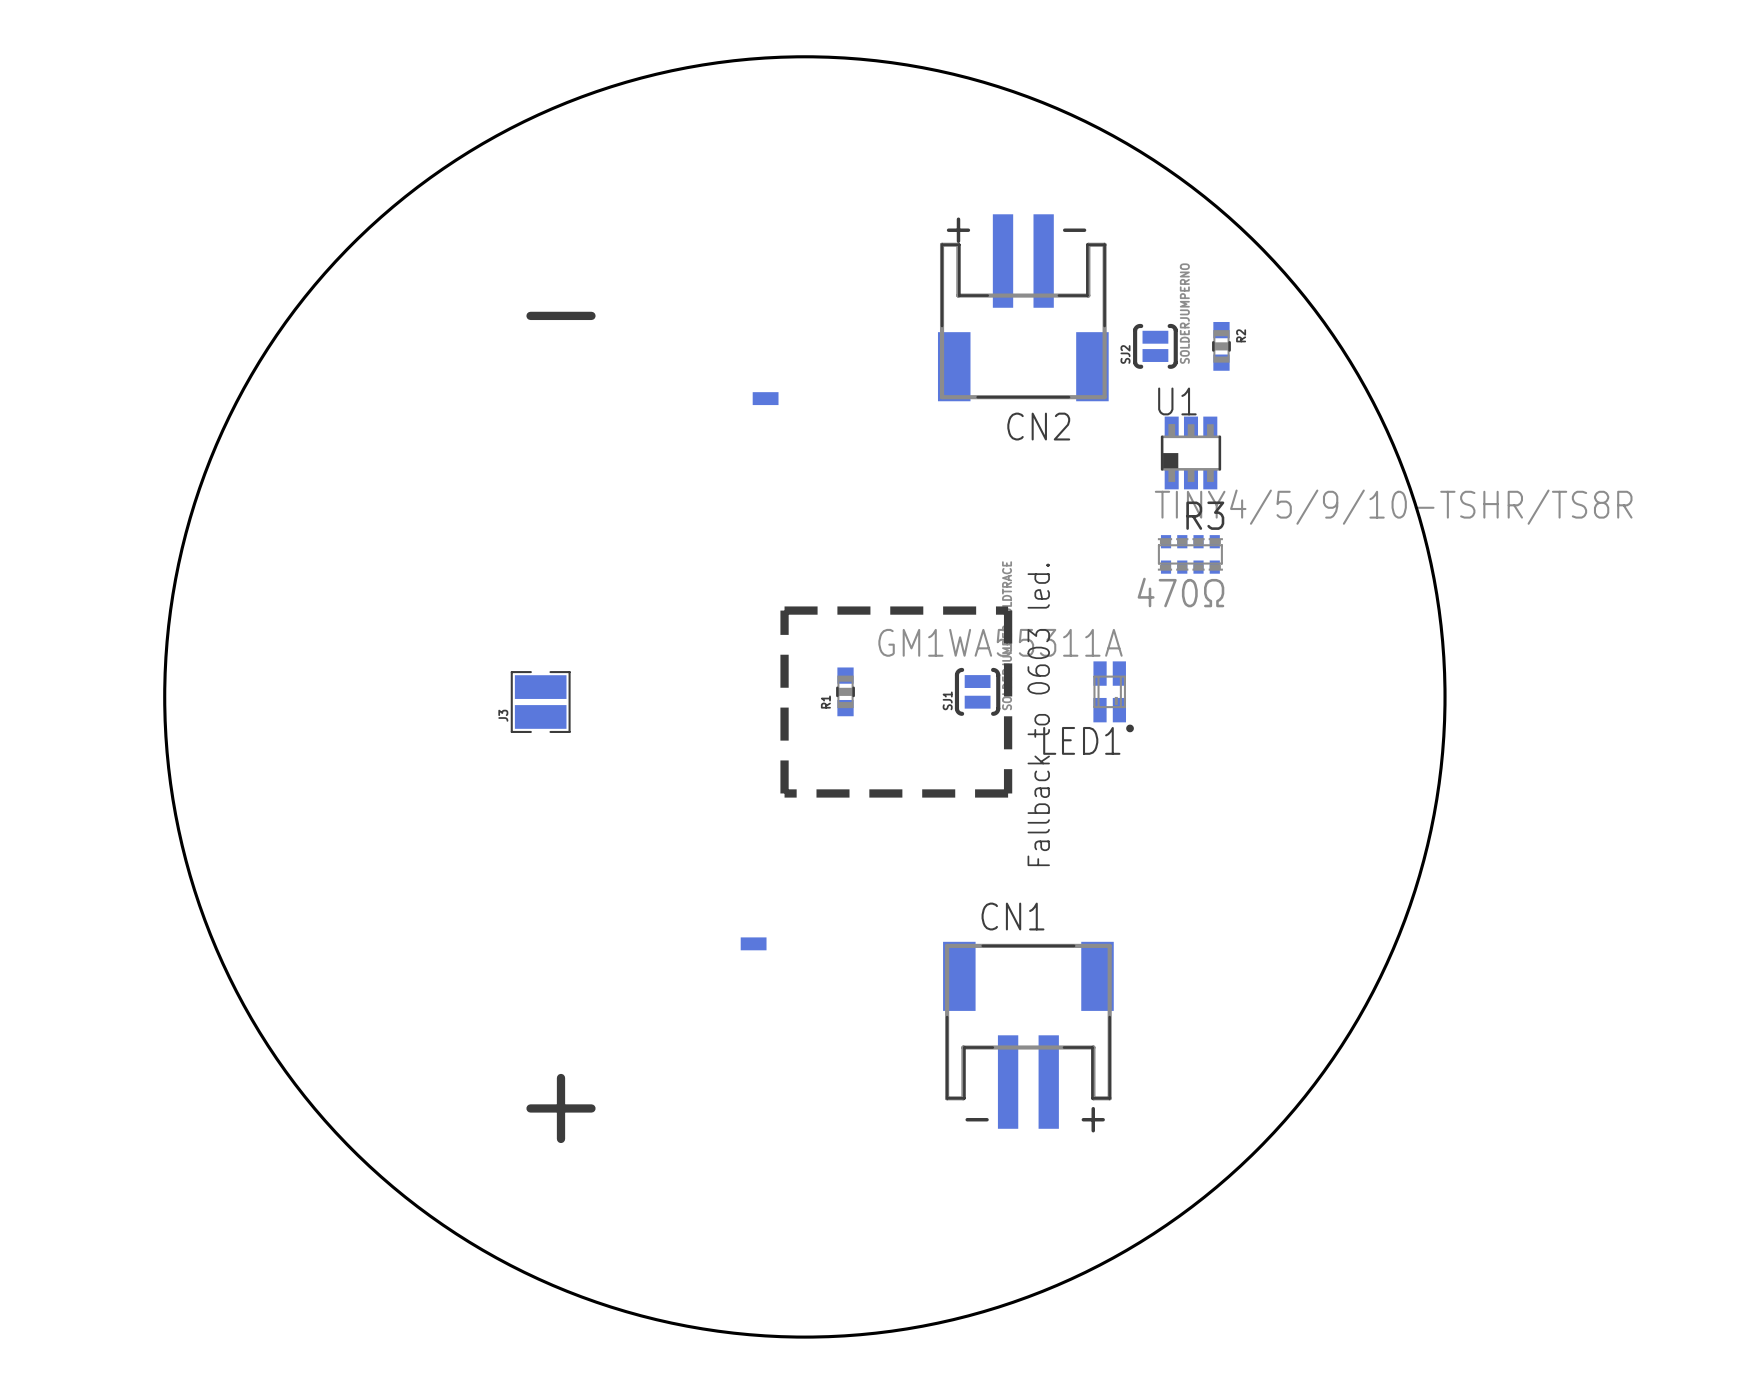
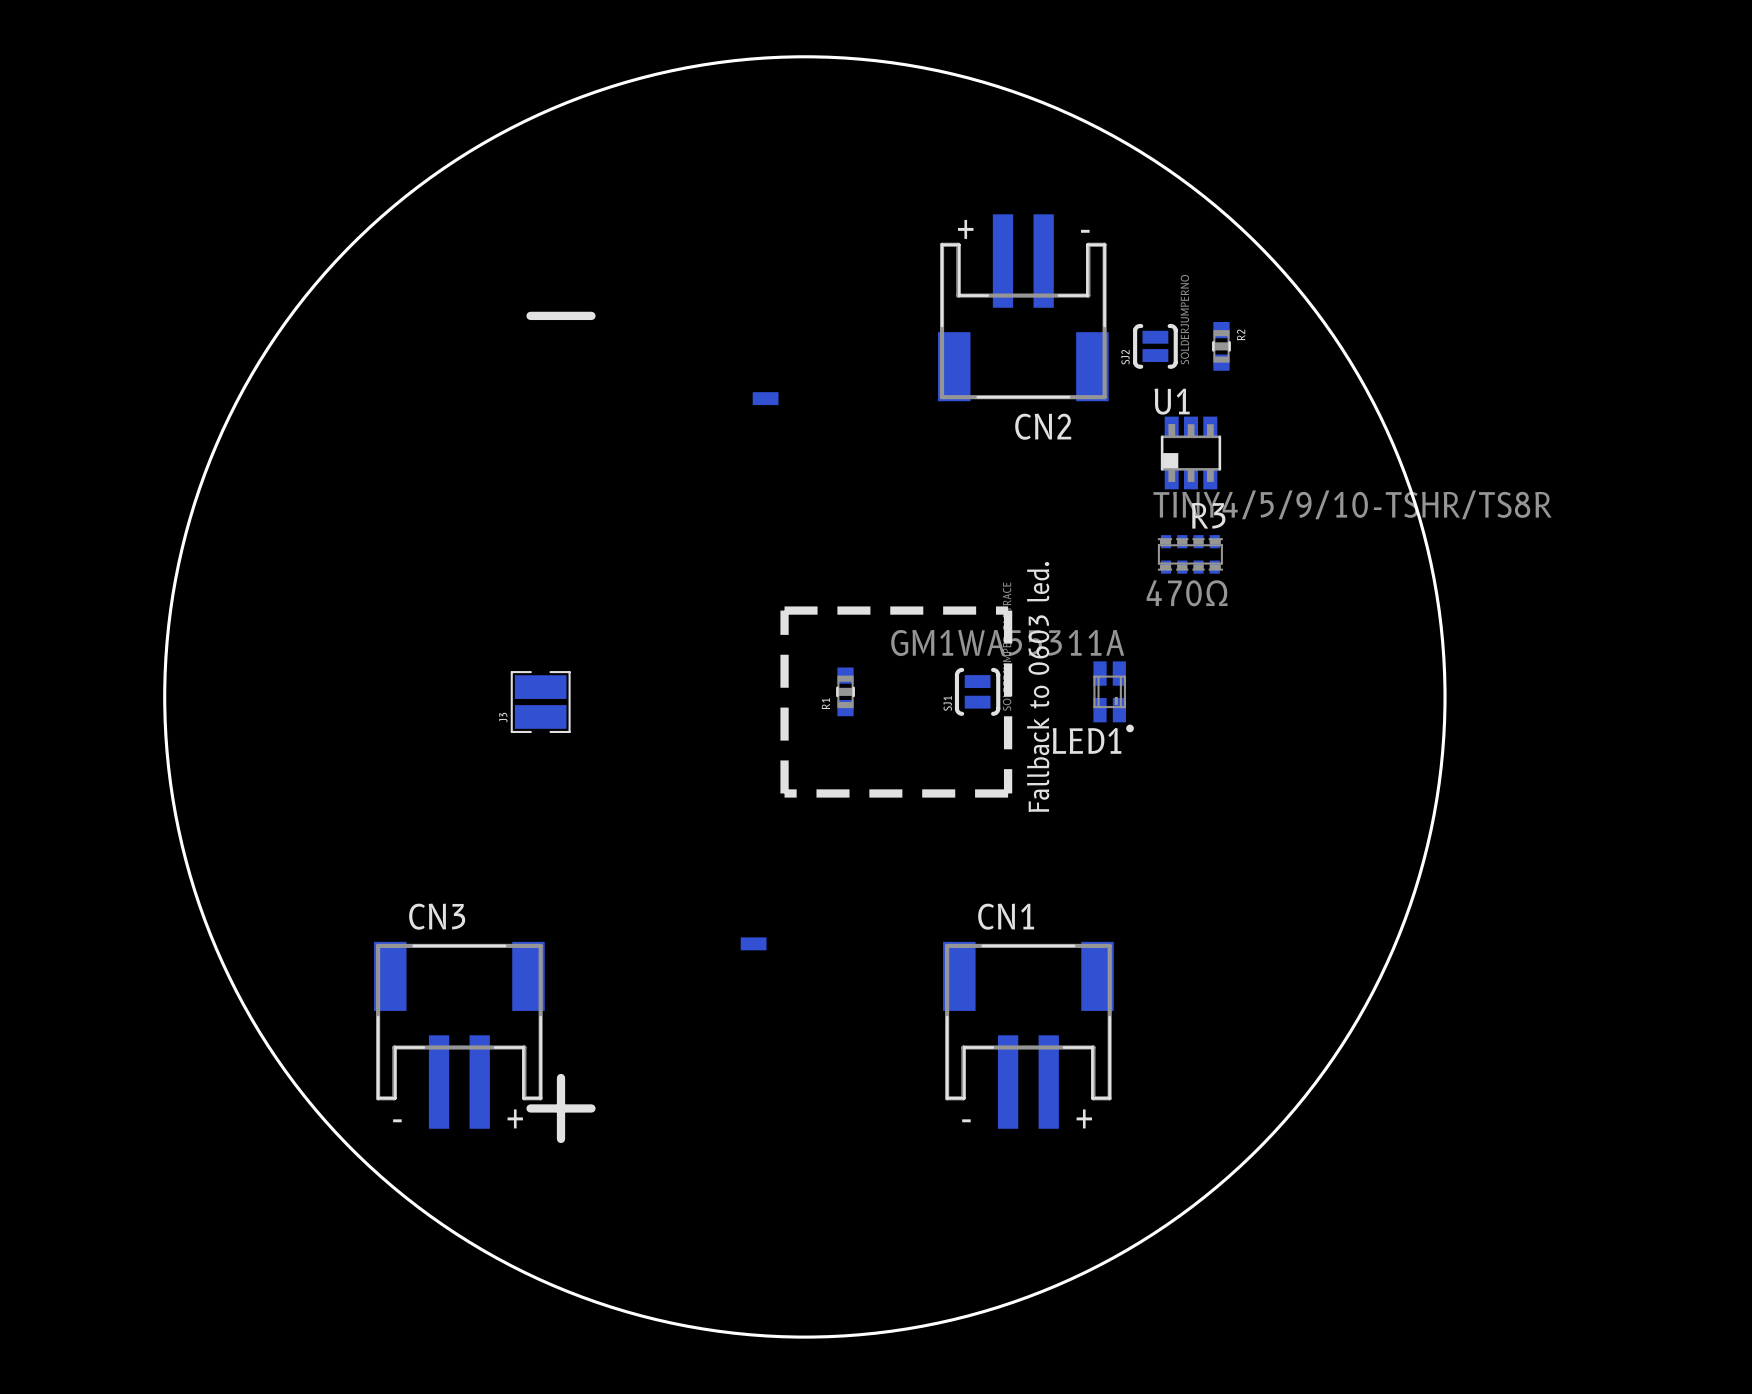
CN3: none -> (459, 1035)

